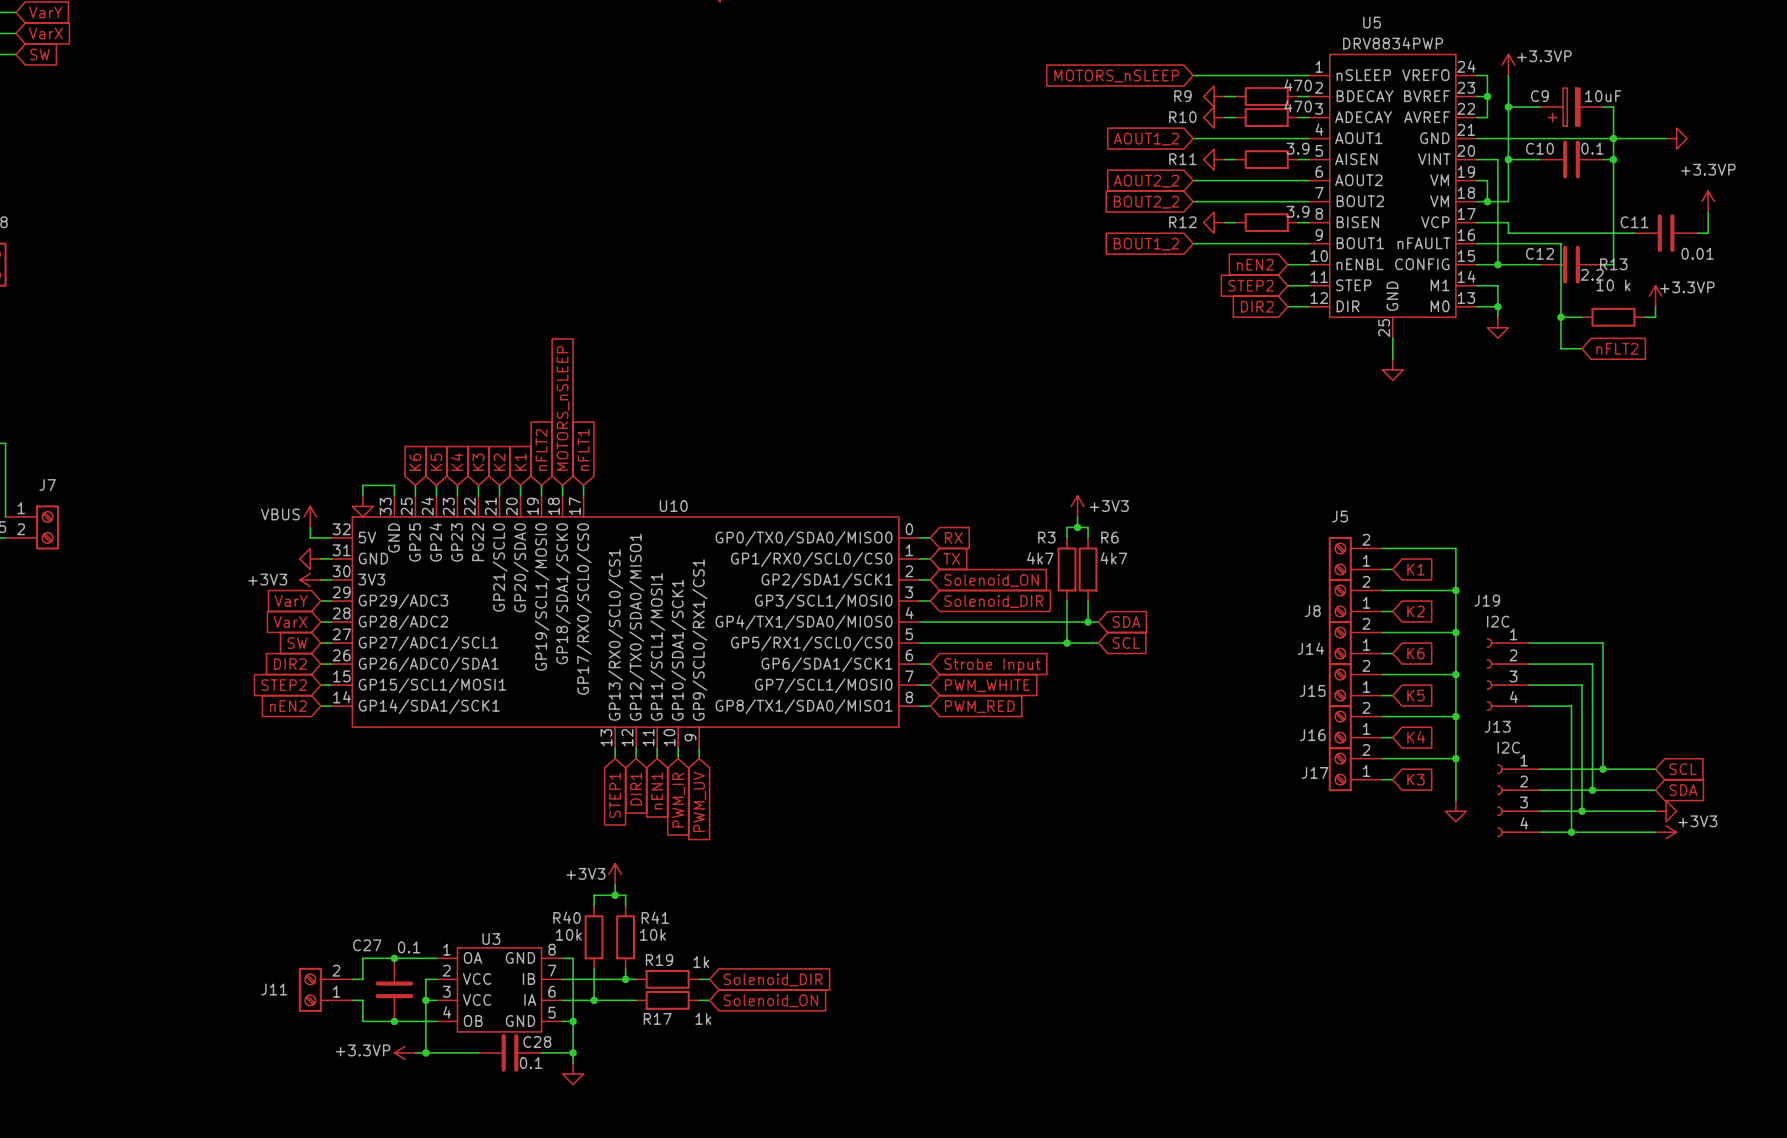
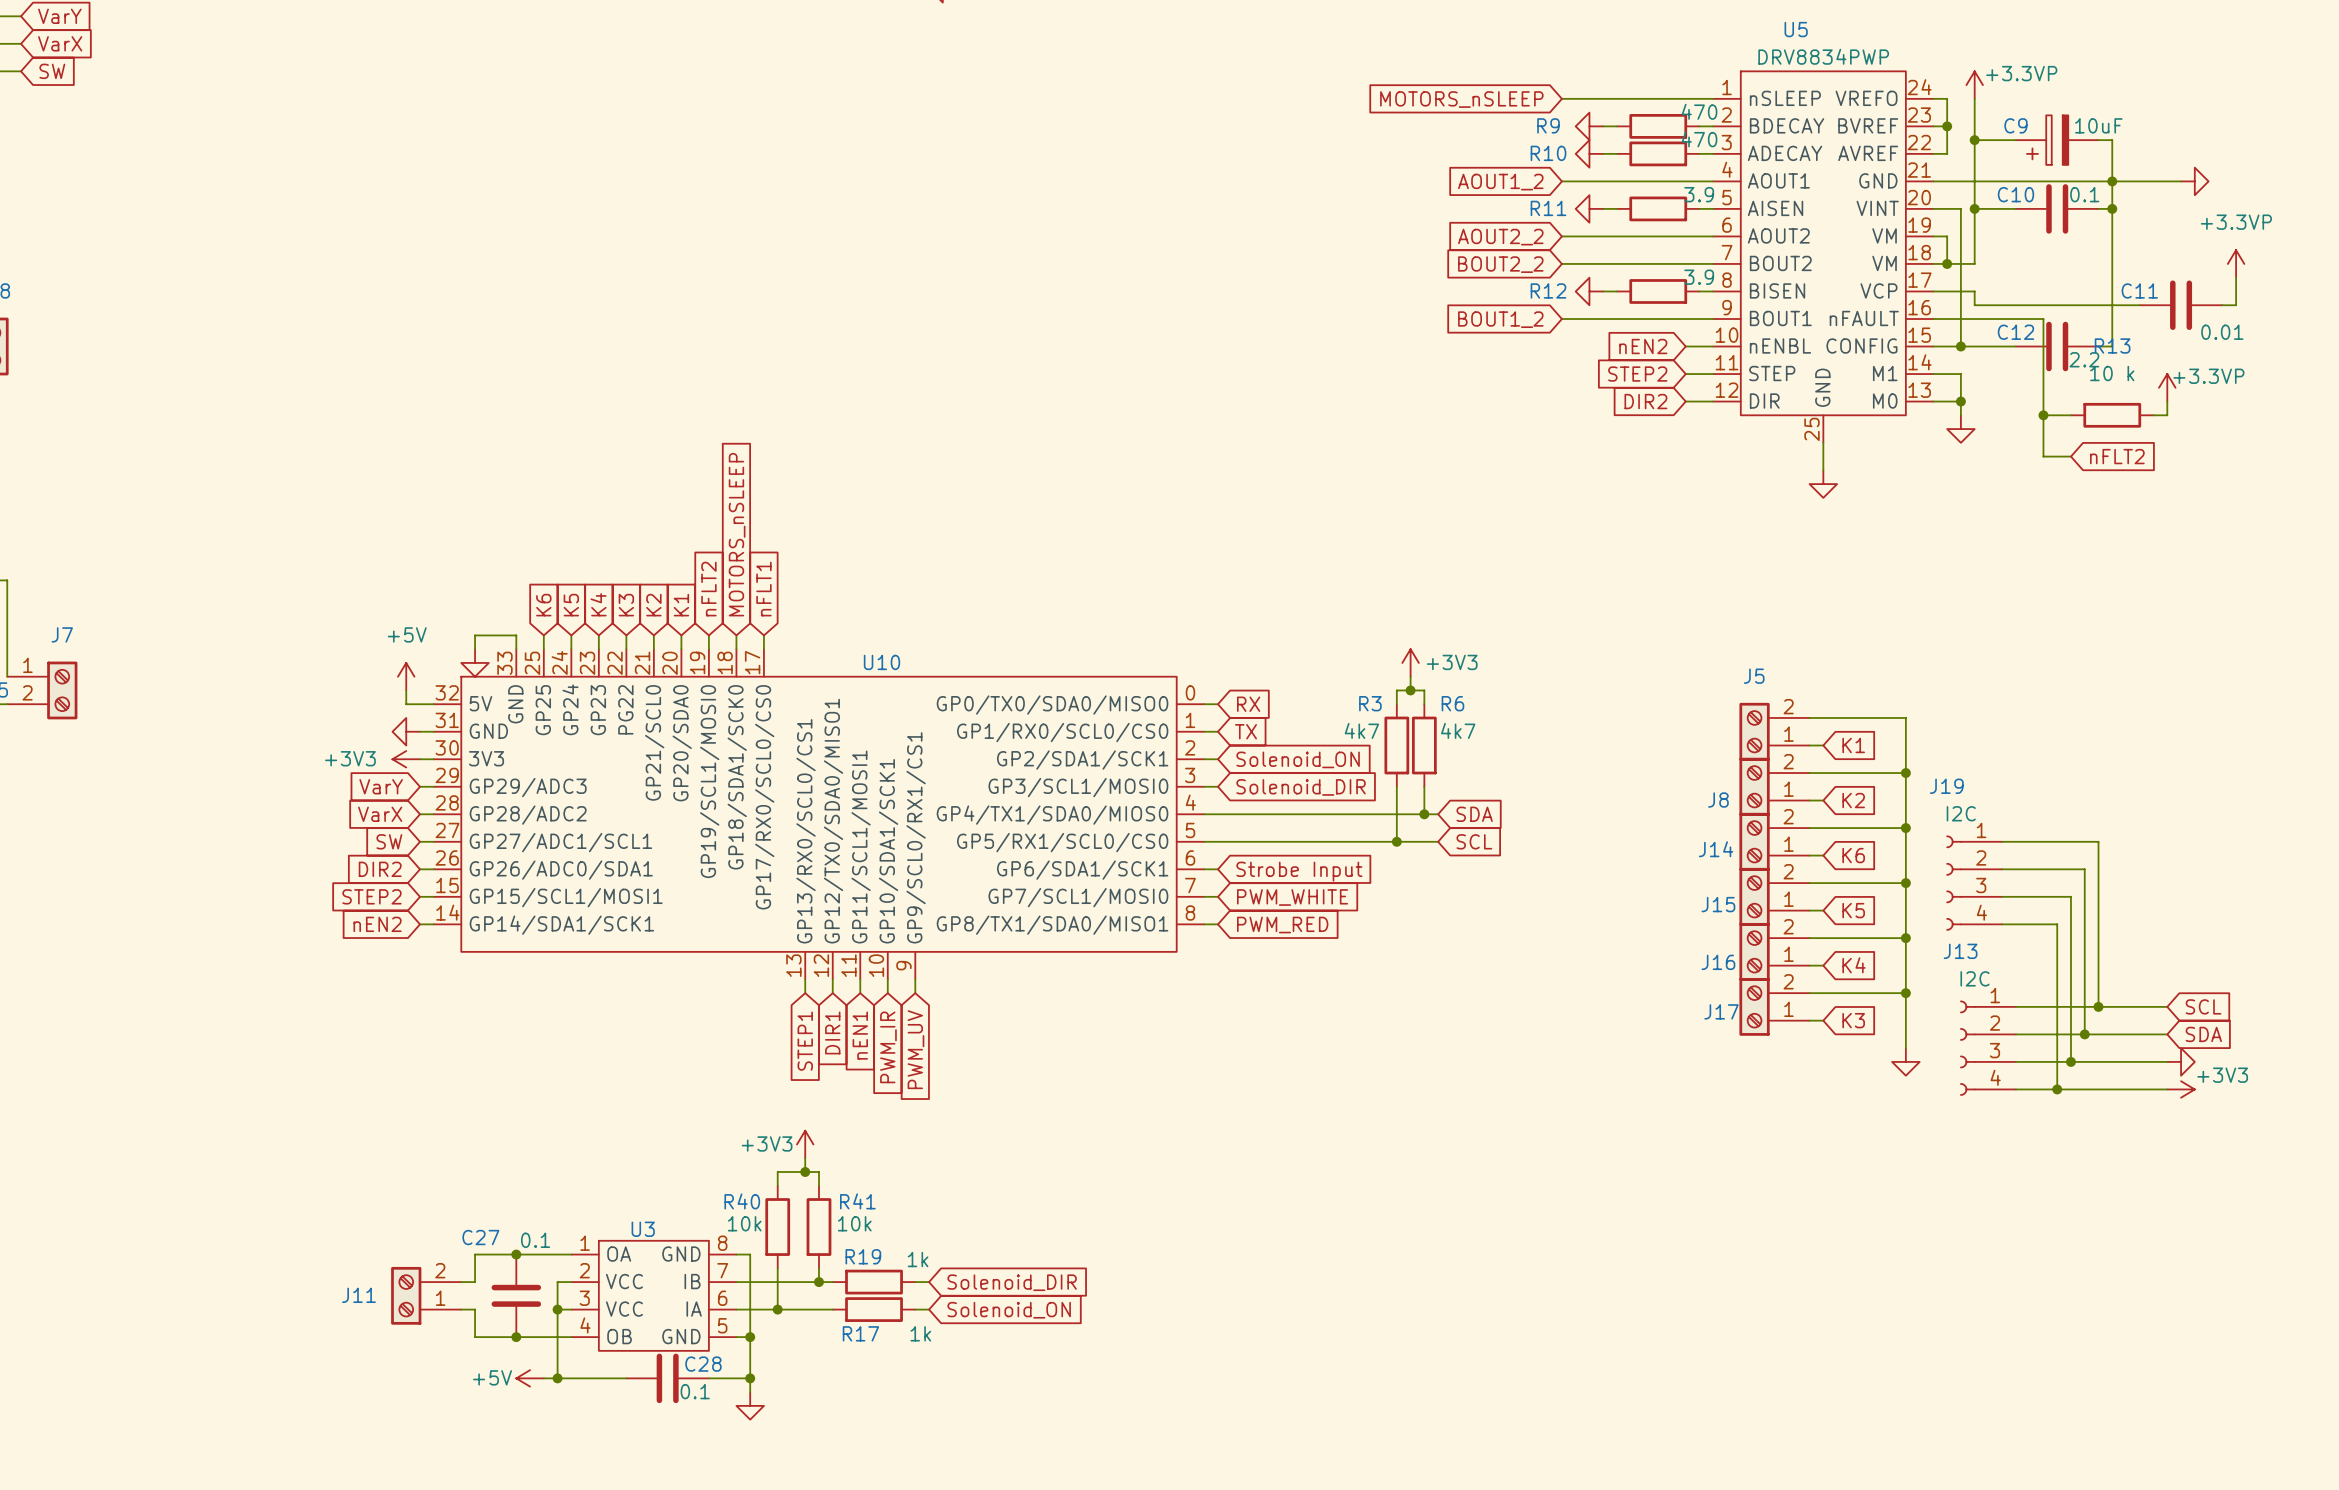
power symbol: VBUS (310, 516) -> +5V (406, 676)
power symbol: +3.3VP (404, 1052) -> +5V (530, 1378)

